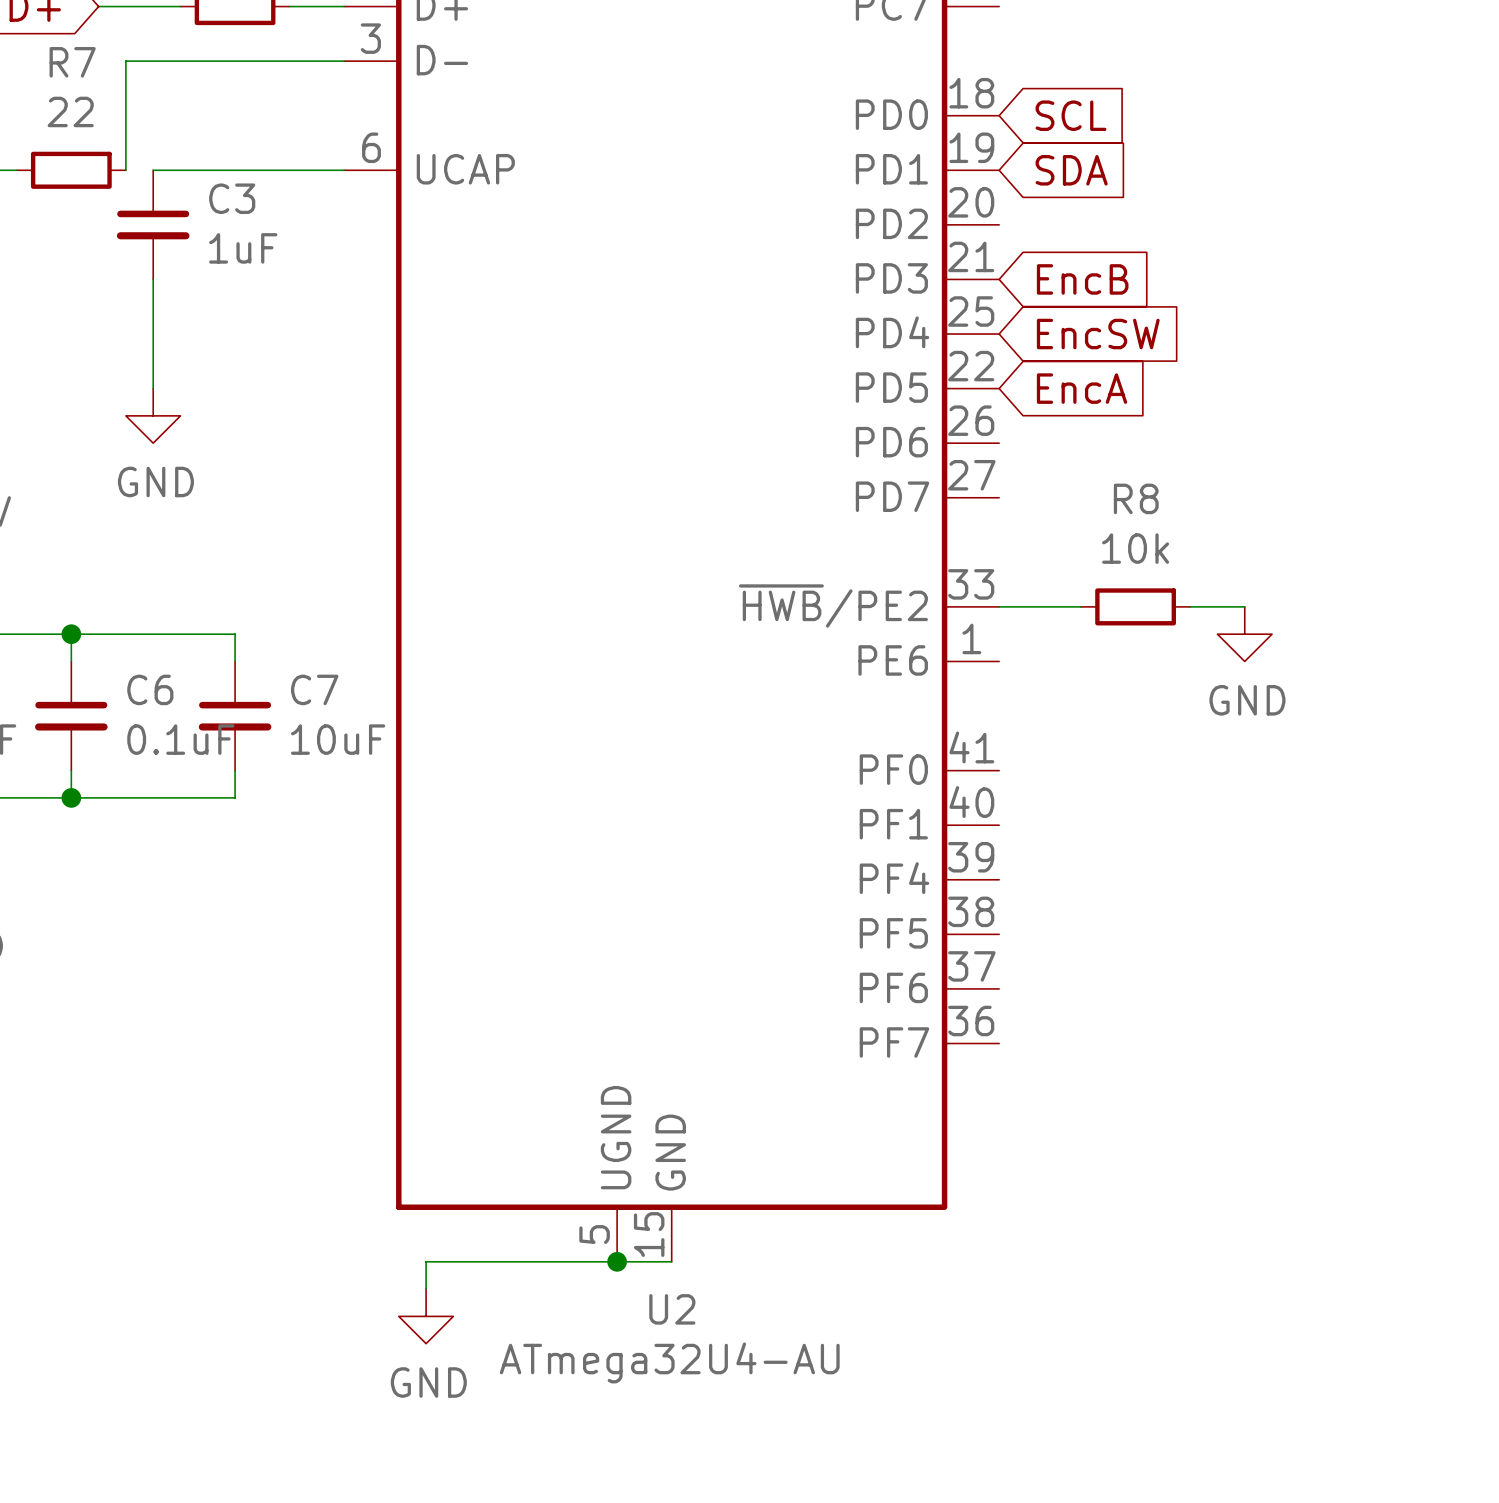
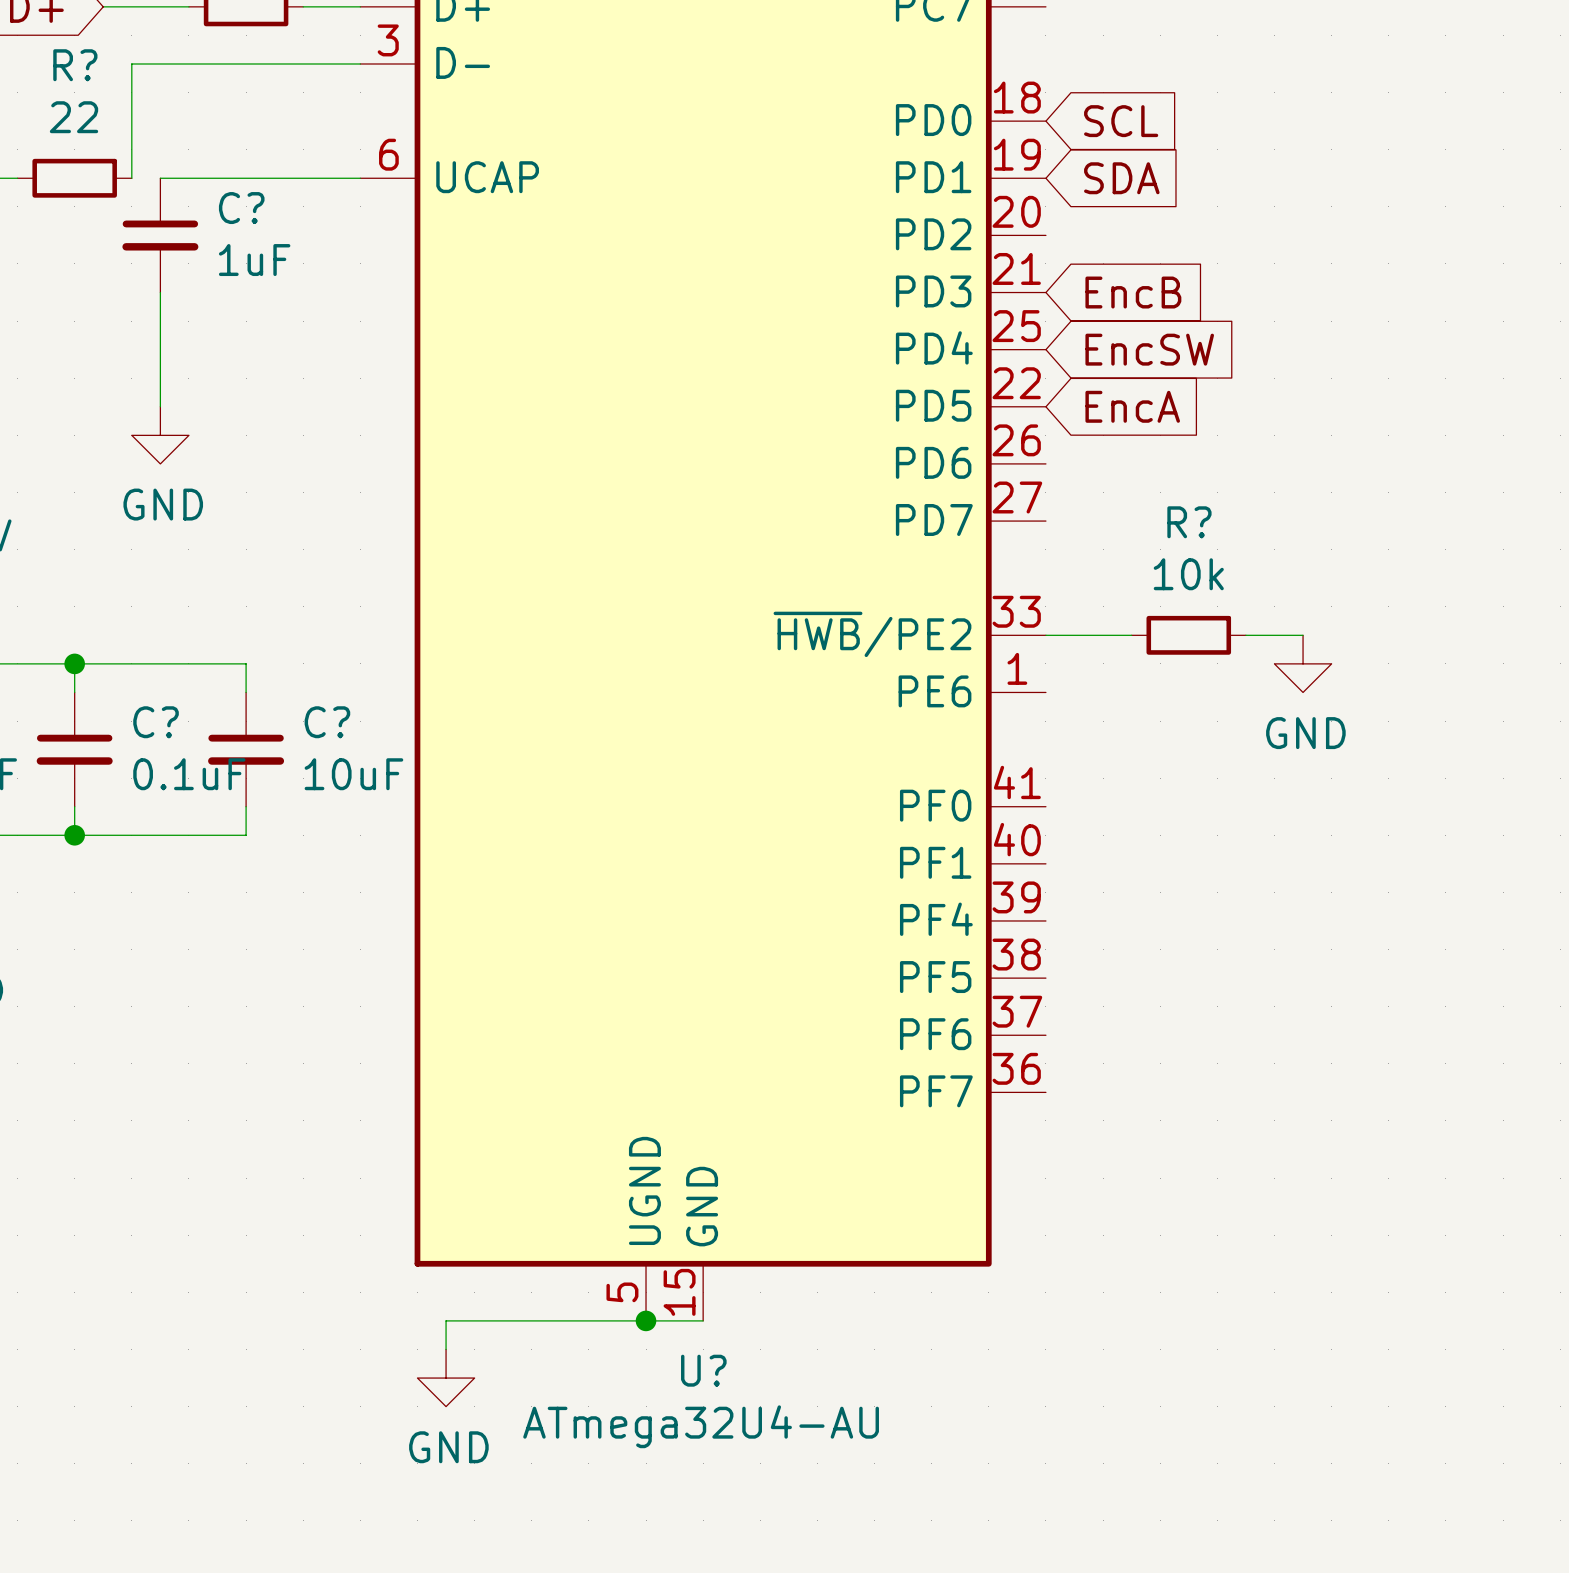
R7 name: R7 (72, 62) -> R? (75, 65)
C3 name: C3 (232, 198) -> C? (241, 208)
R8 name: R8 (1136, 498) -> R? (1189, 522)
C6 name: C6 (150, 689) -> C? (156, 722)
C7 name: C7 (314, 689) -> C? (327, 722)
U2 name: U2 (672, 1309) -> U? (703, 1370)

